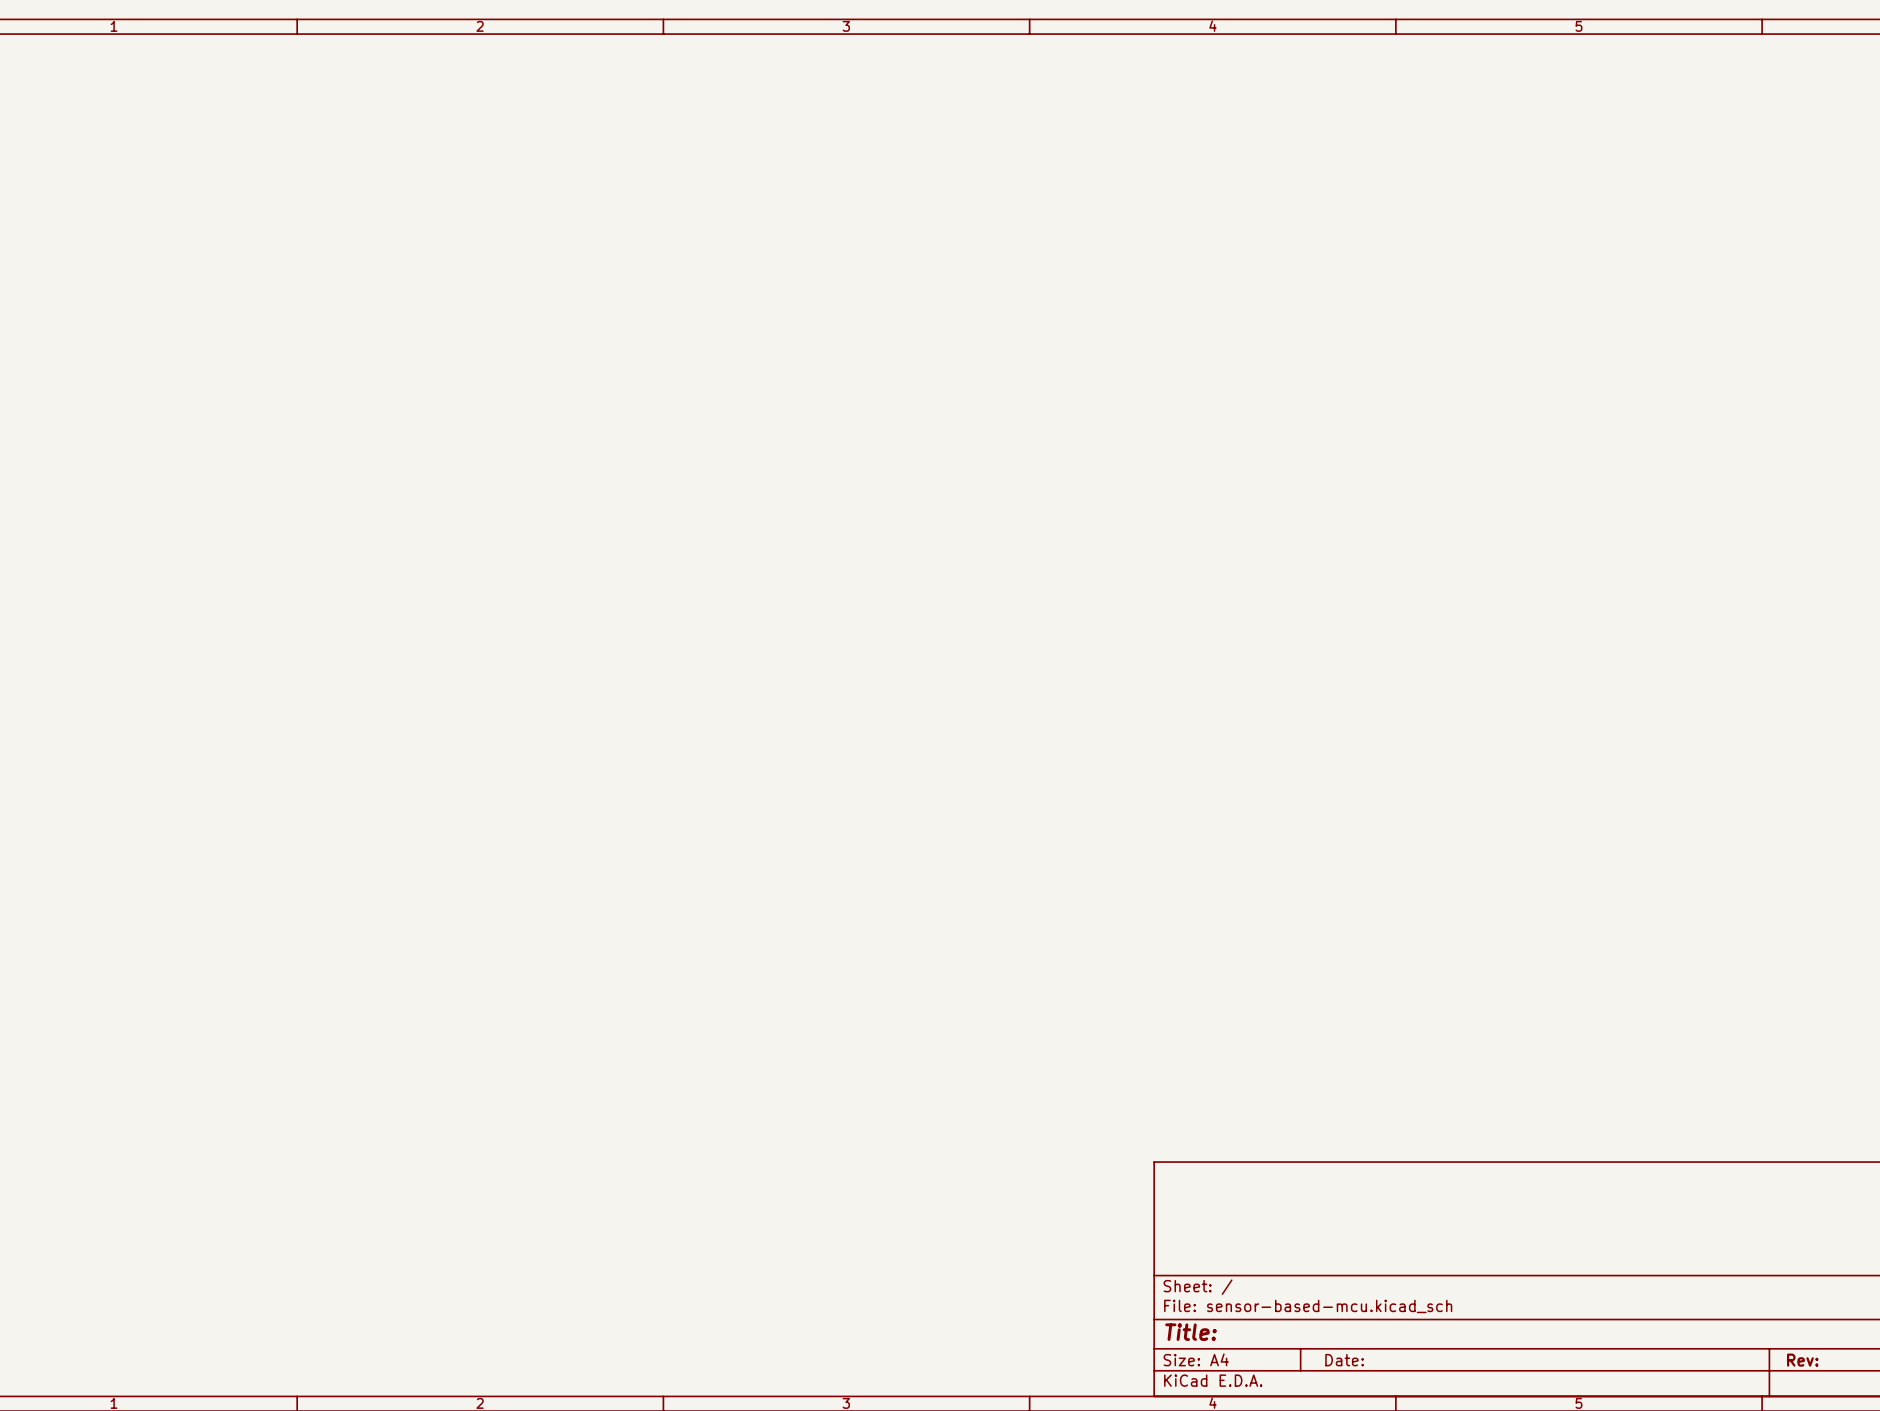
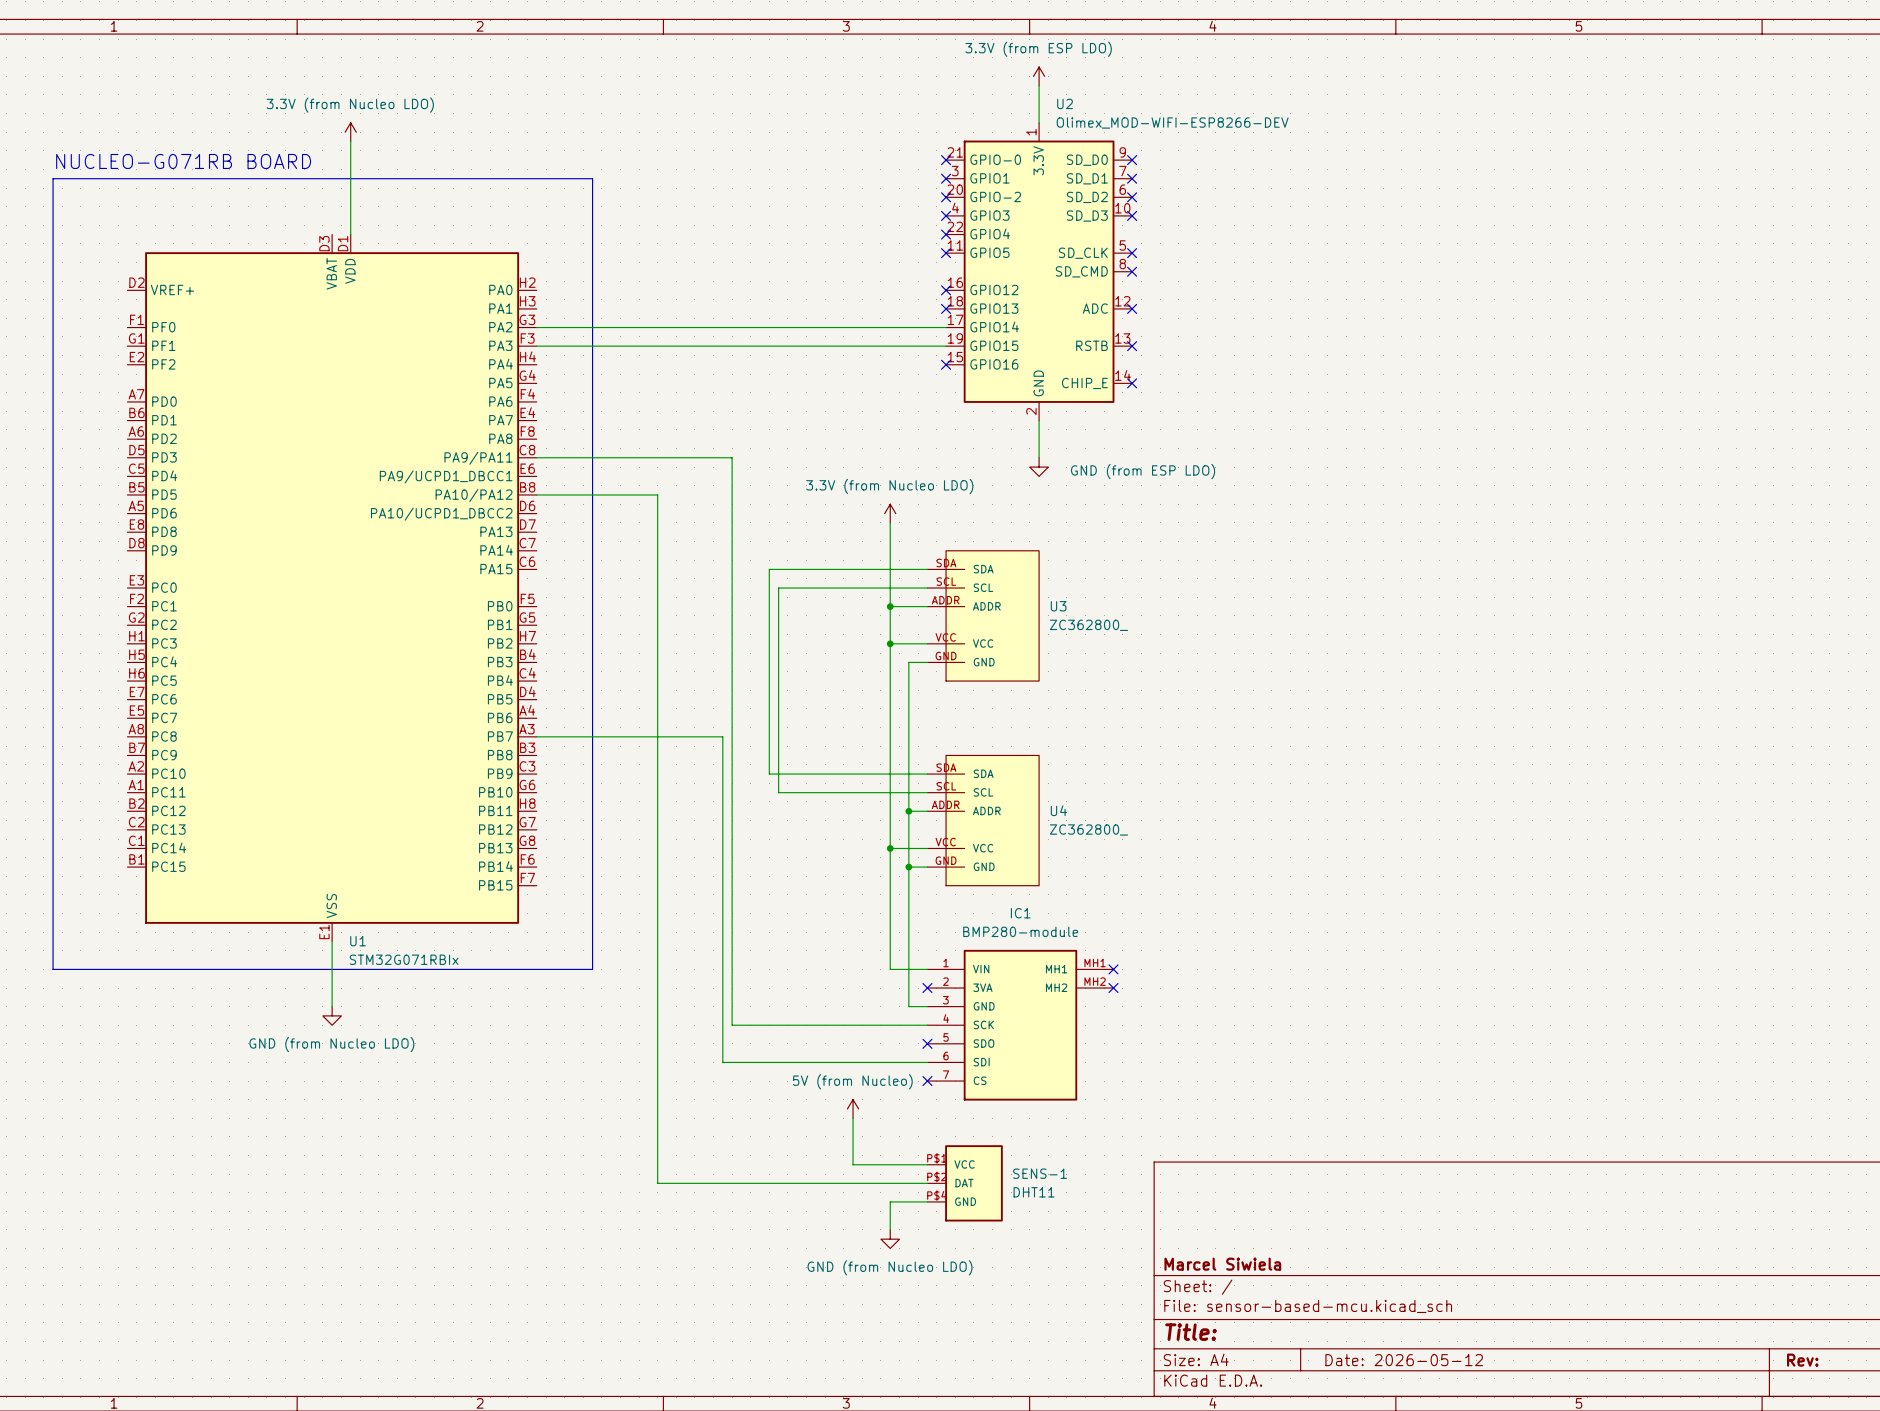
power symbol: none -> 3.3V (from ESP LDO) (1039, 76)
wire: none -> (1039, 85) (1039, 122)
power symbol: none -> 3.3V (from Nucleo LDO) (350, 132)
wire: none -> (350, 141) (350, 234)
no-connect mark: none -> (946, 160)
no-connect mark: none -> (1132, 160)
text: none -> NUCLEO-G071RB BOARD (183, 161)
line: none -> (53, 178) (592, 178) (592, 969) (53, 969) (53, 178)
no-connect mark: none -> (946, 178)
no-connect mark: none -> (1132, 178)
no-connect mark: none -> (946, 197)
no-connect mark: none -> (1132, 197)
no-connect mark: none -> (946, 215)
no-connect mark: none -> (1132, 215)
no-connect mark: none -> (946, 234)
no-connect mark: none -> (946, 253)
no-connect mark: none -> (1132, 253)
U2: none -> Olimex_MOD-WIFI-ESP8266-DEV (1039, 271)
no-connect mark: none -> (1132, 271)
no-connect mark: none -> (946, 290)
no-connect mark: none -> (946, 308)
no-connect mark: none -> (1132, 308)
wire: none -> (536, 327) (946, 327)
wire: none -> (536, 346) (946, 346)
no-connect mark: none -> (1132, 346)
no-connect mark: none -> (946, 364)
no-connect mark: none -> (1132, 383)
wire: none -> (1039, 420) (1039, 457)
wire: none -> (536, 457) (732, 457) (732, 1025) (927, 1025)
power symbol: none -> GND (from ESP LDO) (1039, 467)
wire: none -> (536, 494) (657, 494) (657, 1183) (927, 1183)
power symbol: none -> 3.3V (from Nucleo LDO) (890, 513)
wire: none -> (890, 522) (890, 969) (927, 969)
wire: none -> (927, 569) (769, 569) (769, 774) (927, 774)
U1: none -> STM32G071RBIx (332, 588)
wire: none -> (927, 588) (778, 588) (778, 792) (927, 792)
wire: none -> (890, 606) (927, 606)
junction: none -> (890, 606)
U3: none -> ZC362800_ (983, 615)
wire: none -> (890, 643) (927, 643)
junction: none -> (890, 643)
wire: none -> (927, 662) (908, 662) (908, 1006) (927, 1006)
wire: none -> (536, 736) (722, 736) (722, 1062) (927, 1062)
wire: none -> (908, 811) (927, 811)
junction: none -> (908, 811)
U4: none -> ZC362800_ (983, 820)
wire: none -> (890, 848) (927, 848)
junction: none -> (890, 848)
wire: none -> (908, 867) (927, 867)
junction: none -> (908, 867)
wire: none -> (332, 941) (332, 1006)
no-connect mark: none -> (1113, 969)
no-connect mark: none -> (927, 988)
no-connect mark: none -> (1113, 988)
power symbol: none -> GND (from Nucleo LDO) (332, 1015)
IC1: none -> BMP280-module (1020, 1025)
no-connect mark: none -> (927, 1043)
no-connect mark: none -> (927, 1081)
power symbol: none -> 5V (from Nucleo) (853, 1108)
wire: none -> (853, 1118) (853, 1164) (927, 1164)
SENS-1: none -> DHT11 (965, 1183)
wire: none -> (927, 1201) (890, 1201) (890, 1229)
power symbol: none -> GND (from Nucleo LDO) (890, 1239)
title block: none -> Marcel Siwiela (1222, 1264)
title block: Date: (1344, 1360) -> Date: 2026-05-12 (1404, 1360)

